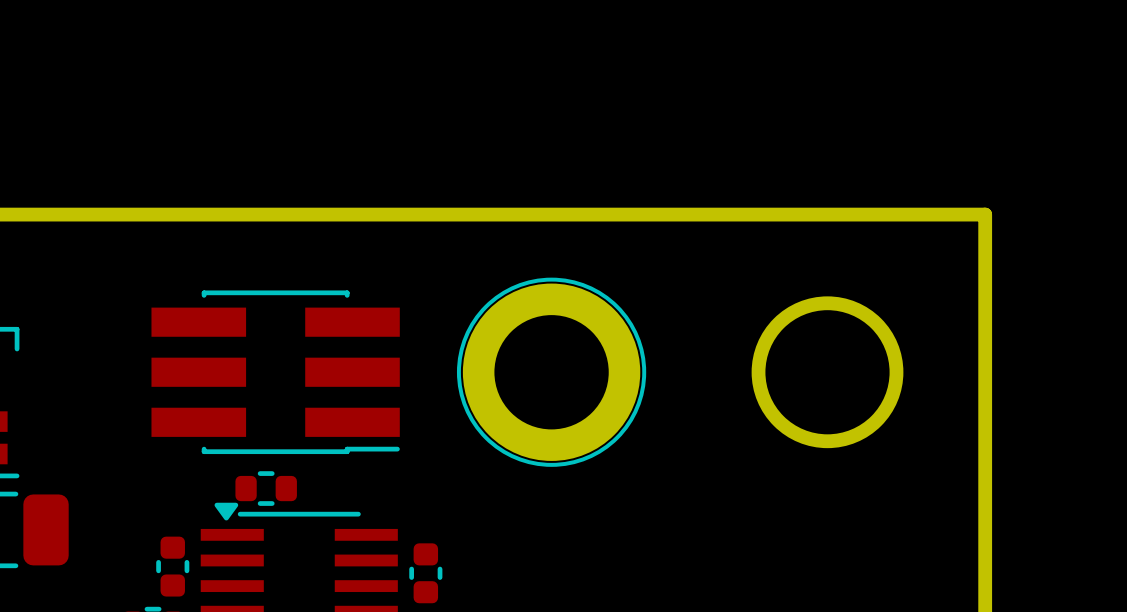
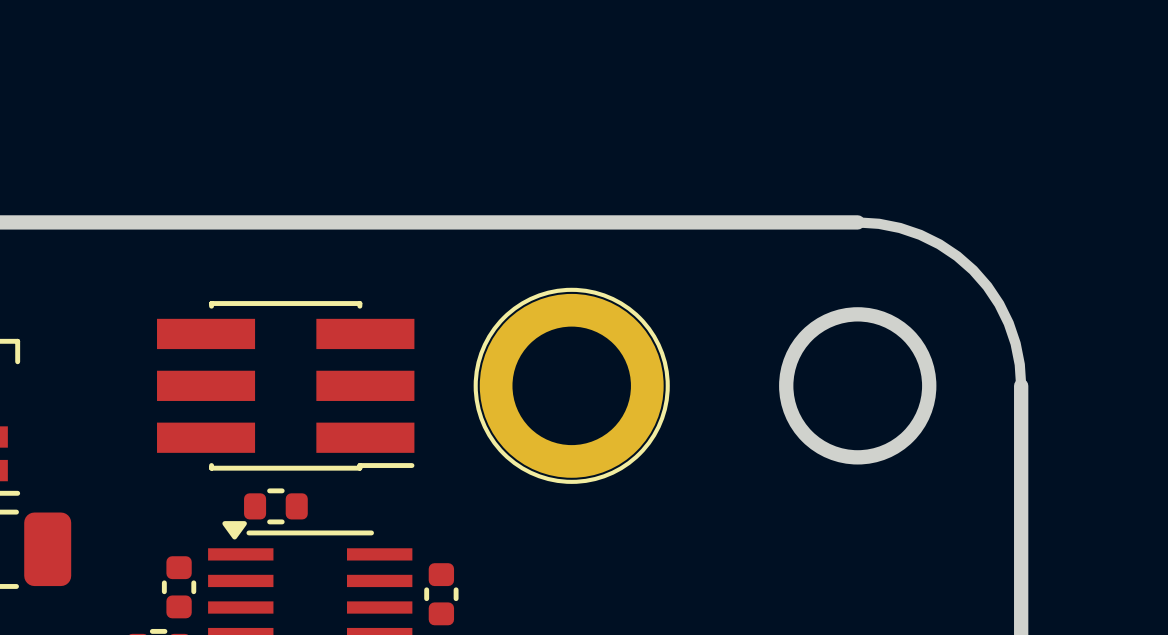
board edge: (827, 214) (985, 214) (985, 372) -> (857, 222) (900, 227) (920, 234) (957, 256) (973, 270) (999, 304) (1008, 323) (1019, 364) (1021, 385)

